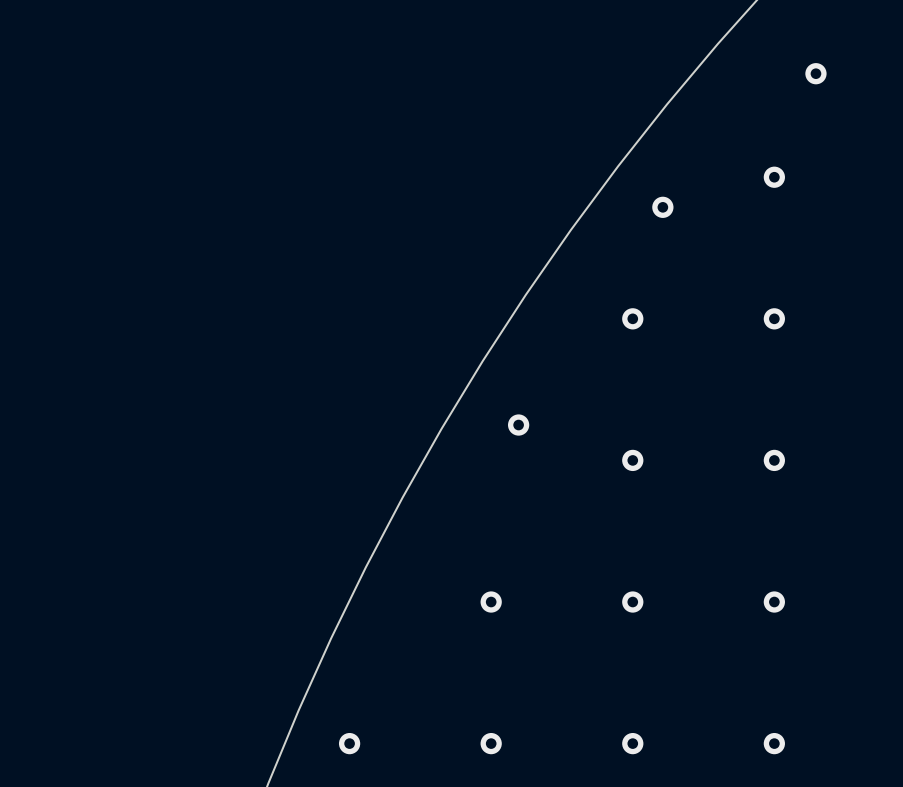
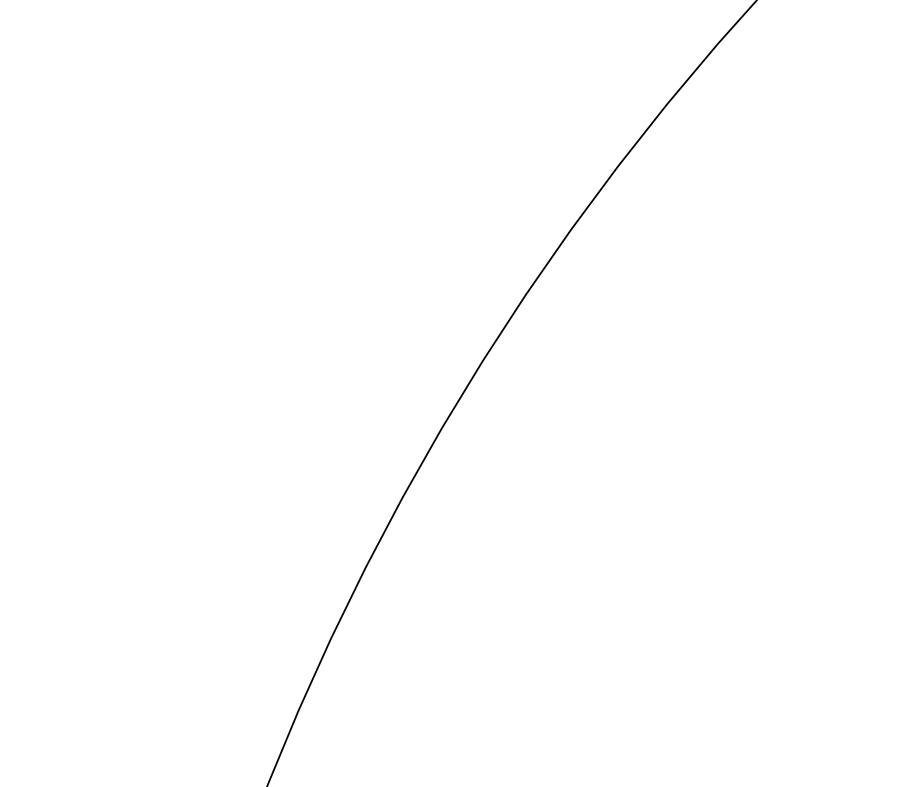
via: (815, 73) -> none
via: (774, 177) -> none
via: (662, 207) -> none
via: (632, 318) -> none
via: (774, 318) -> none
via: (518, 425) -> none
via: (632, 460) -> none
via: (774, 460) -> none
via: (491, 602) -> none
via: (632, 602) -> none
via: (774, 602) -> none
via: (349, 743) -> none
via: (491, 743) -> none
via: (632, 743) -> none
via: (774, 743) -> none

